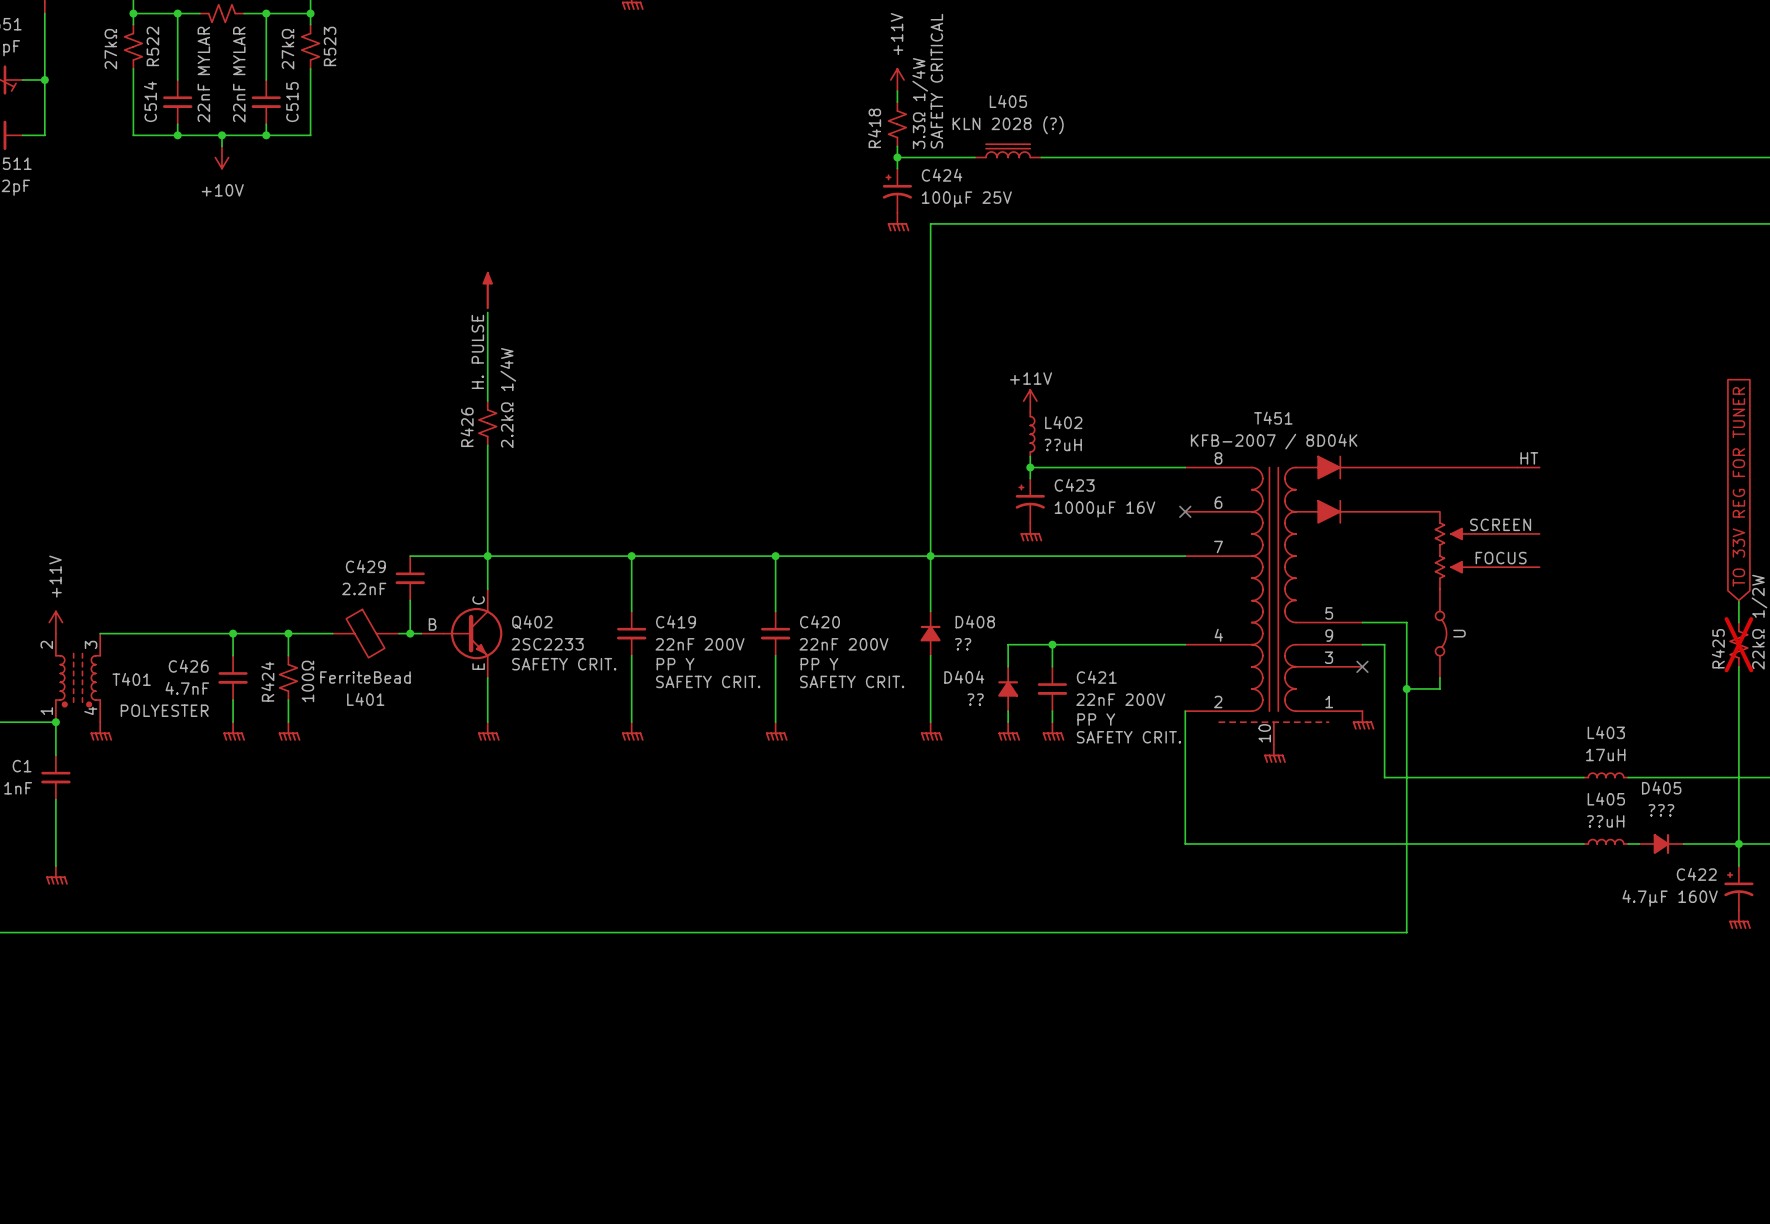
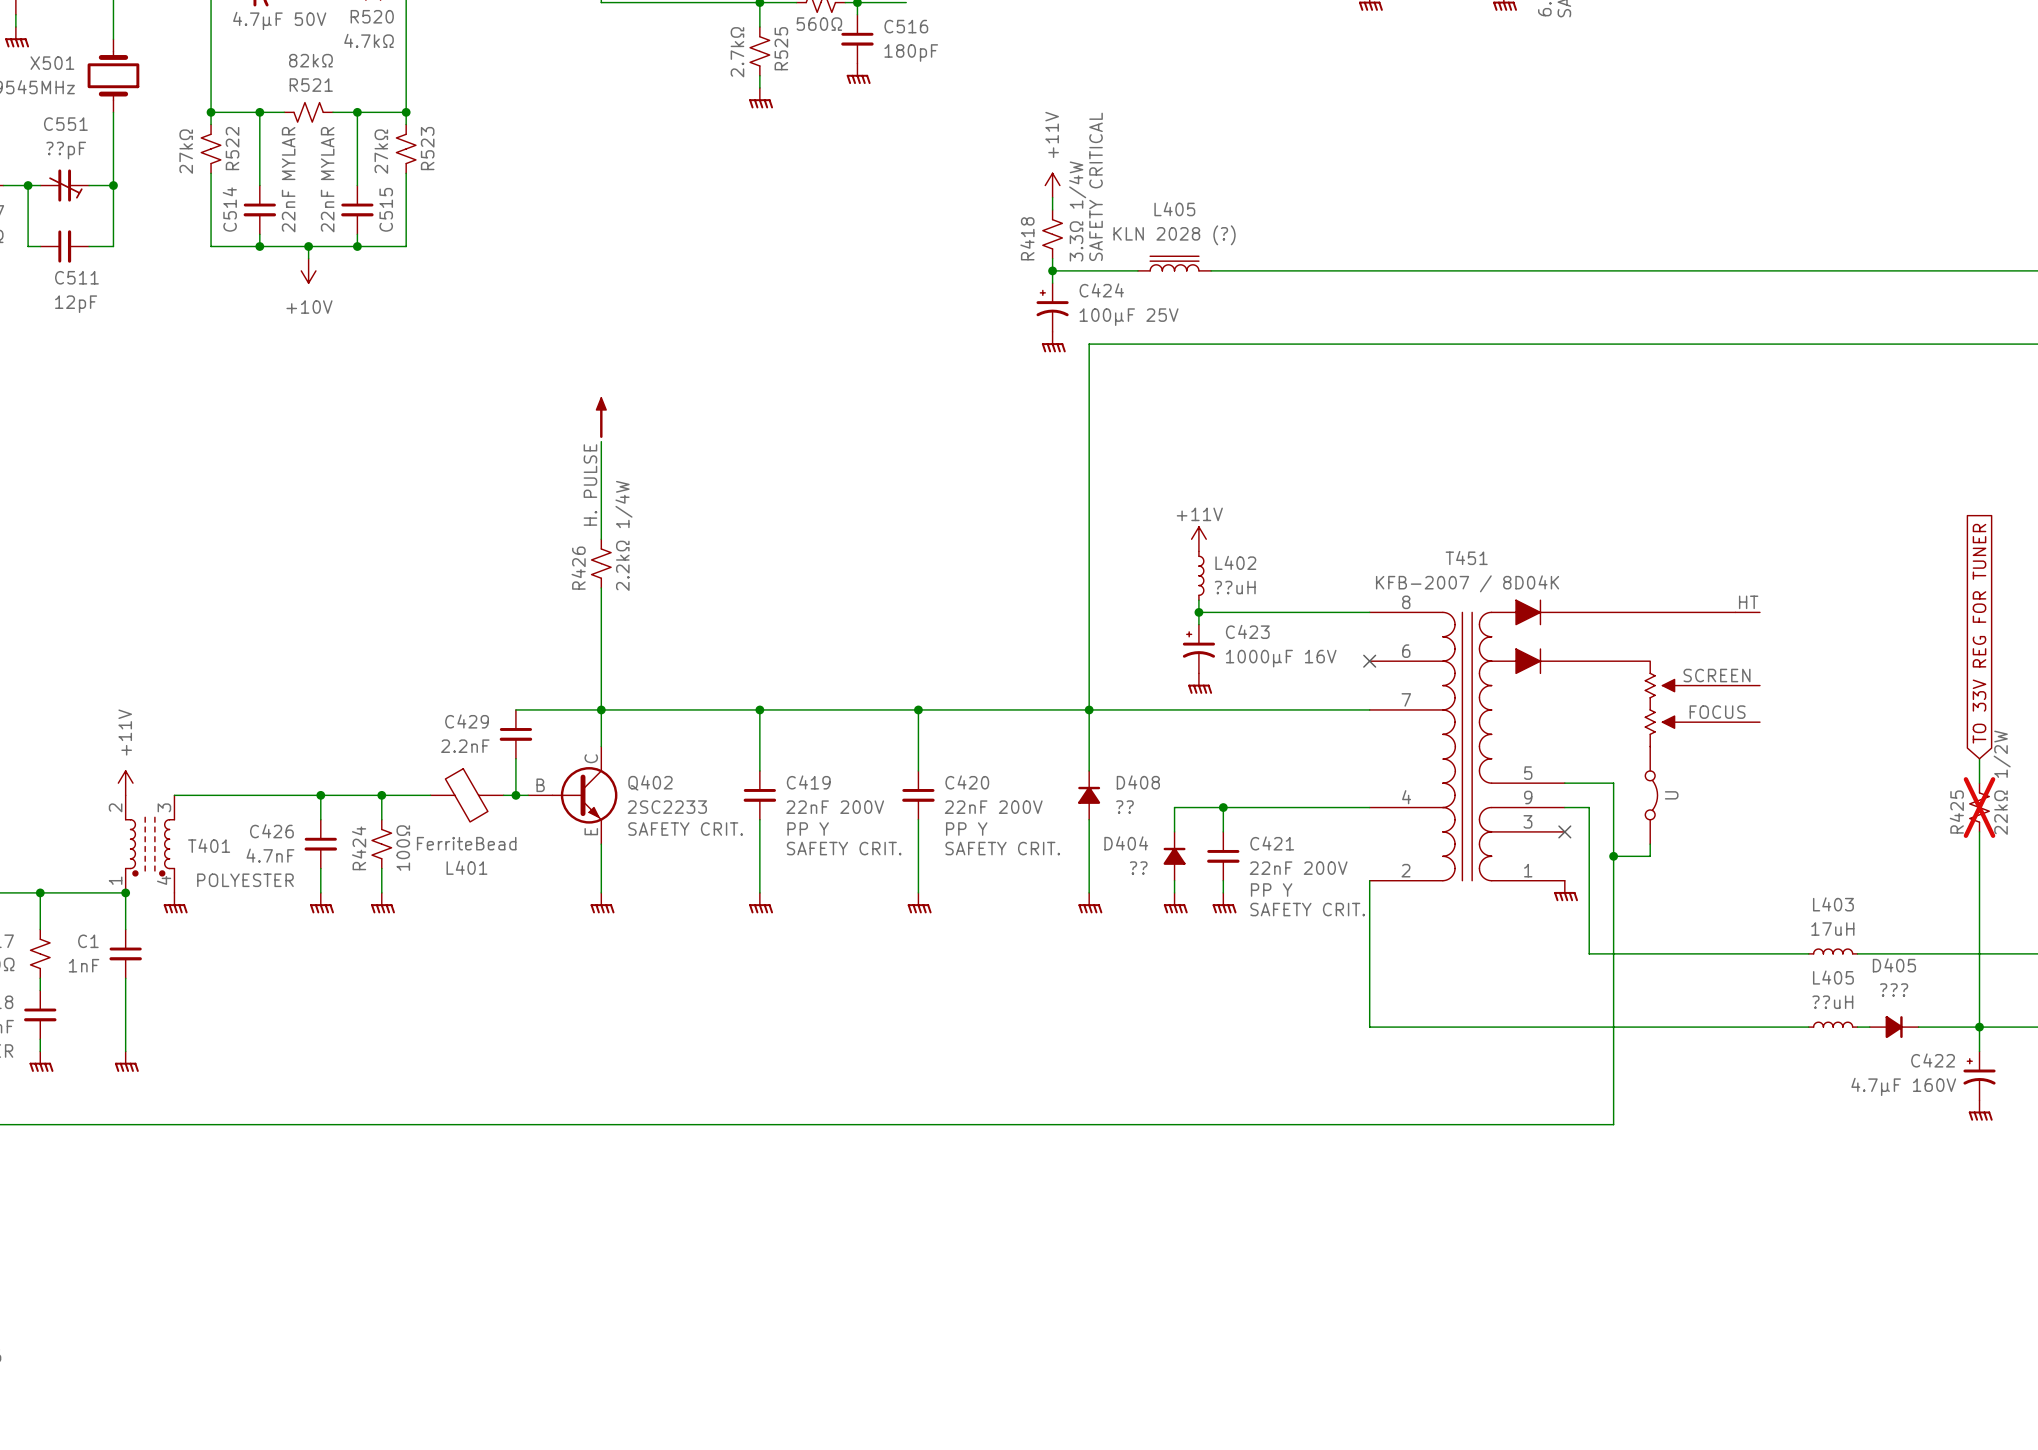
T451 symbol: [1185, 456, 1540, 745] -> [1369, 600, 1760, 881]
power symbol: (1274, 753) -> none

